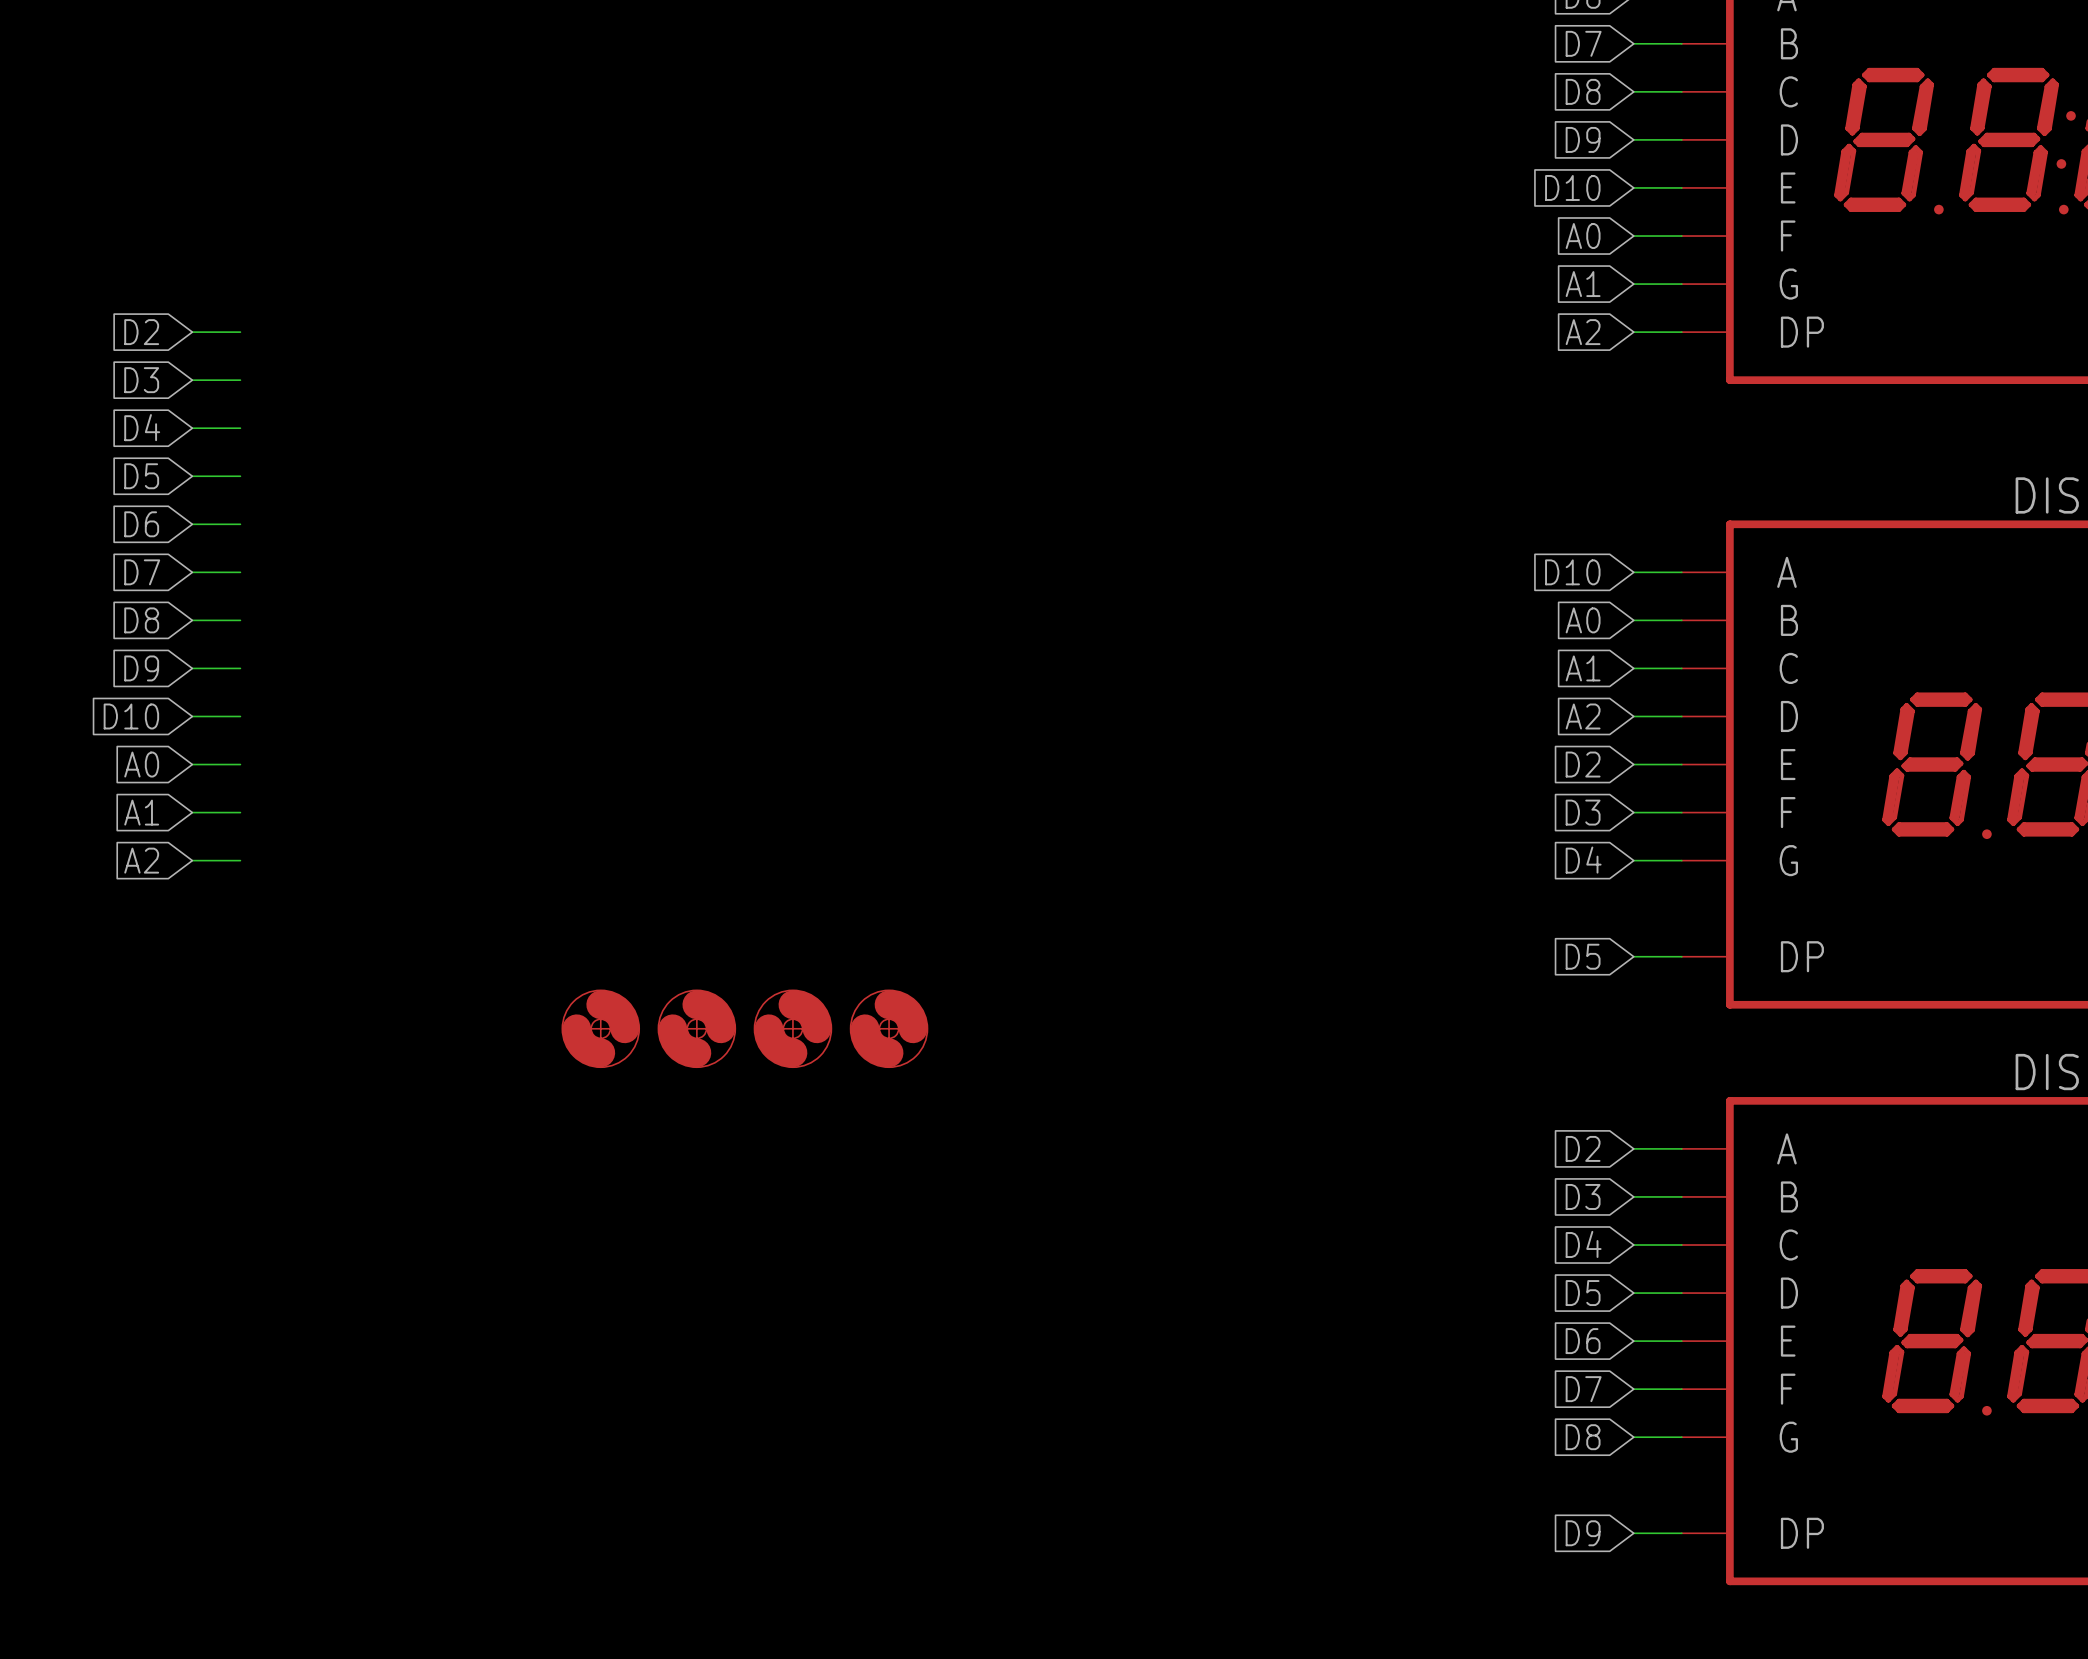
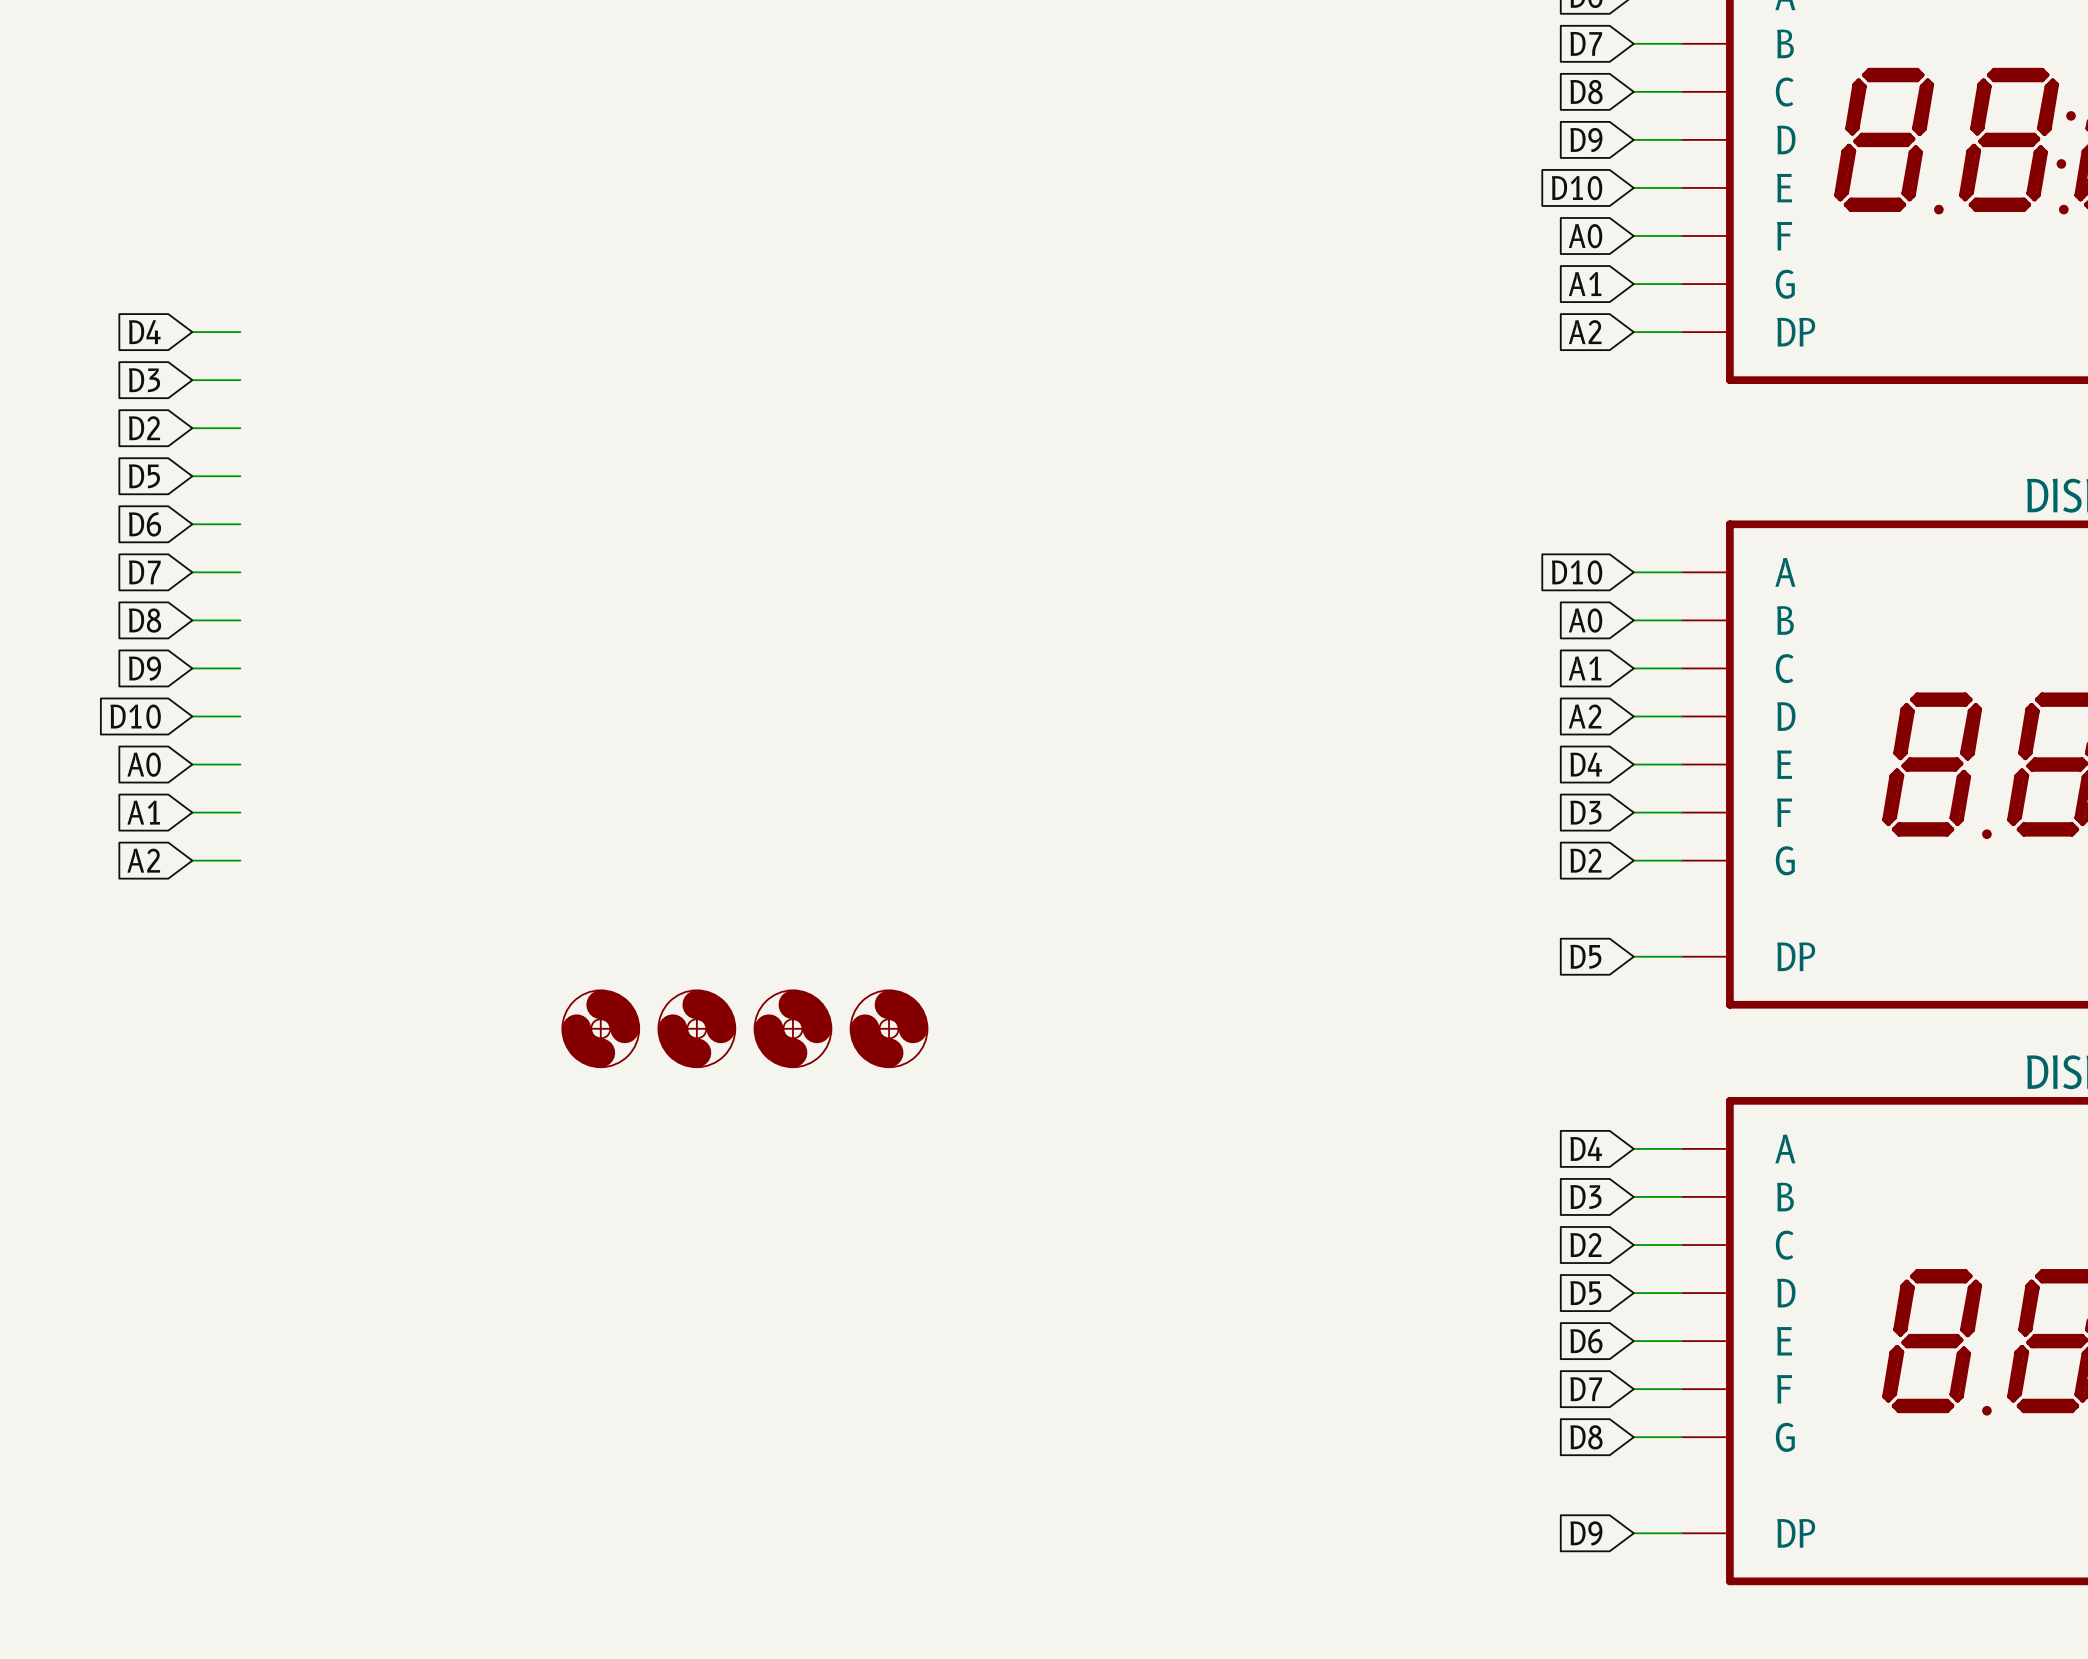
global label: D2 (141, 332) -> D4 (144, 332)
global label: D4 (142, 427) -> D2 (144, 428)
global label: D2 (1583, 764) -> D4 (1586, 764)
global label: D4 (1583, 860) -> D2 (1585, 860)
global label: D2 (1583, 1148) -> D4 (1586, 1148)
global label: D4 (1583, 1244) -> D2 (1585, 1245)

